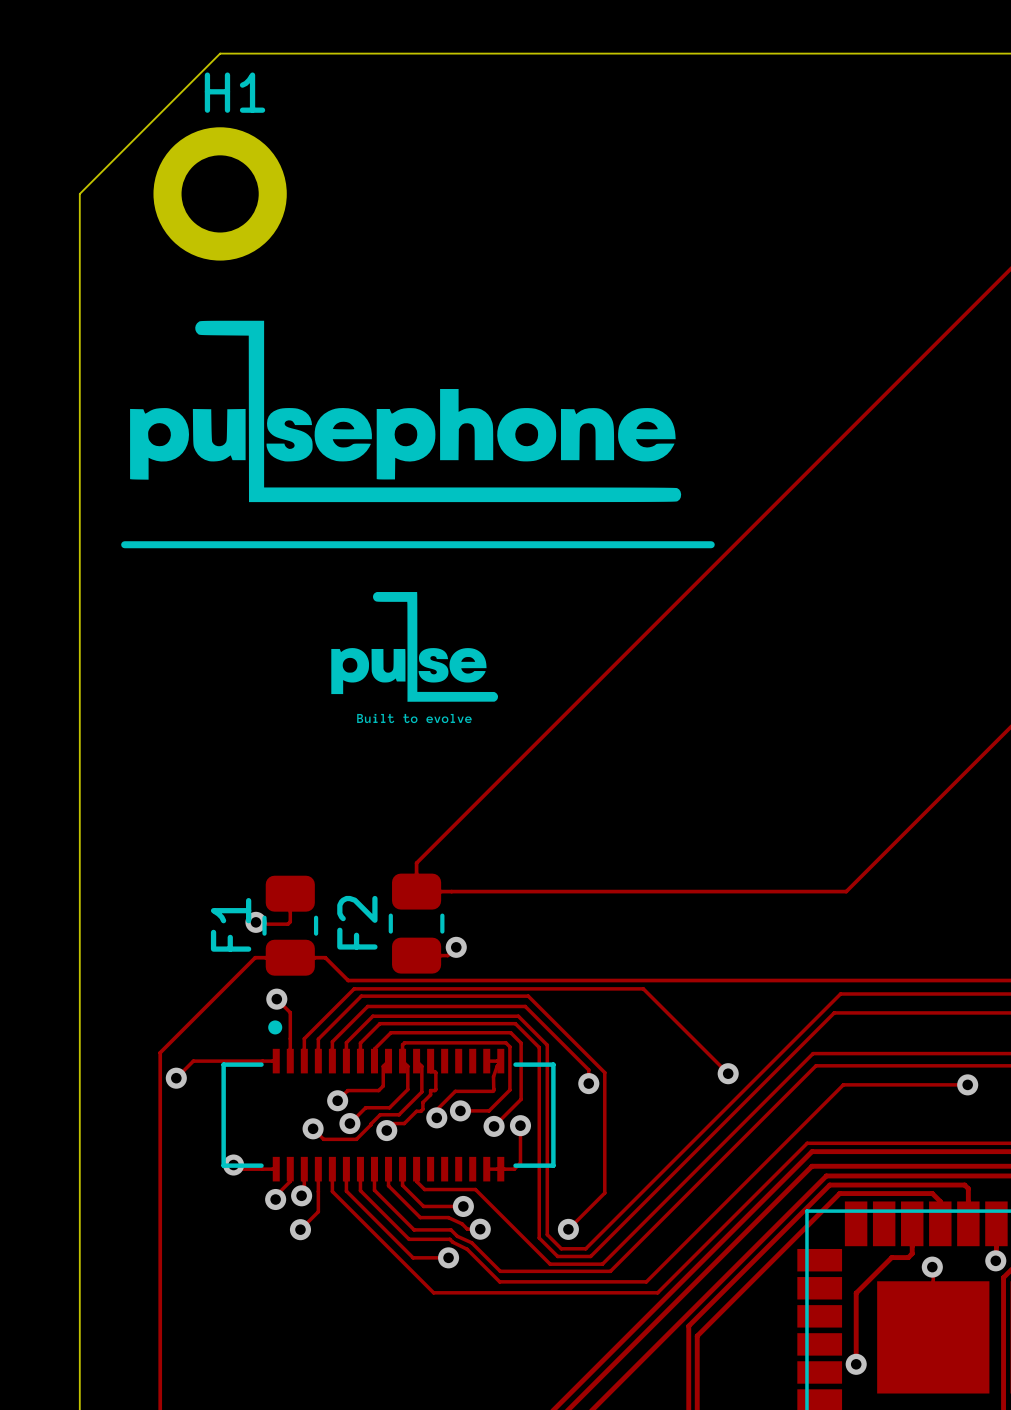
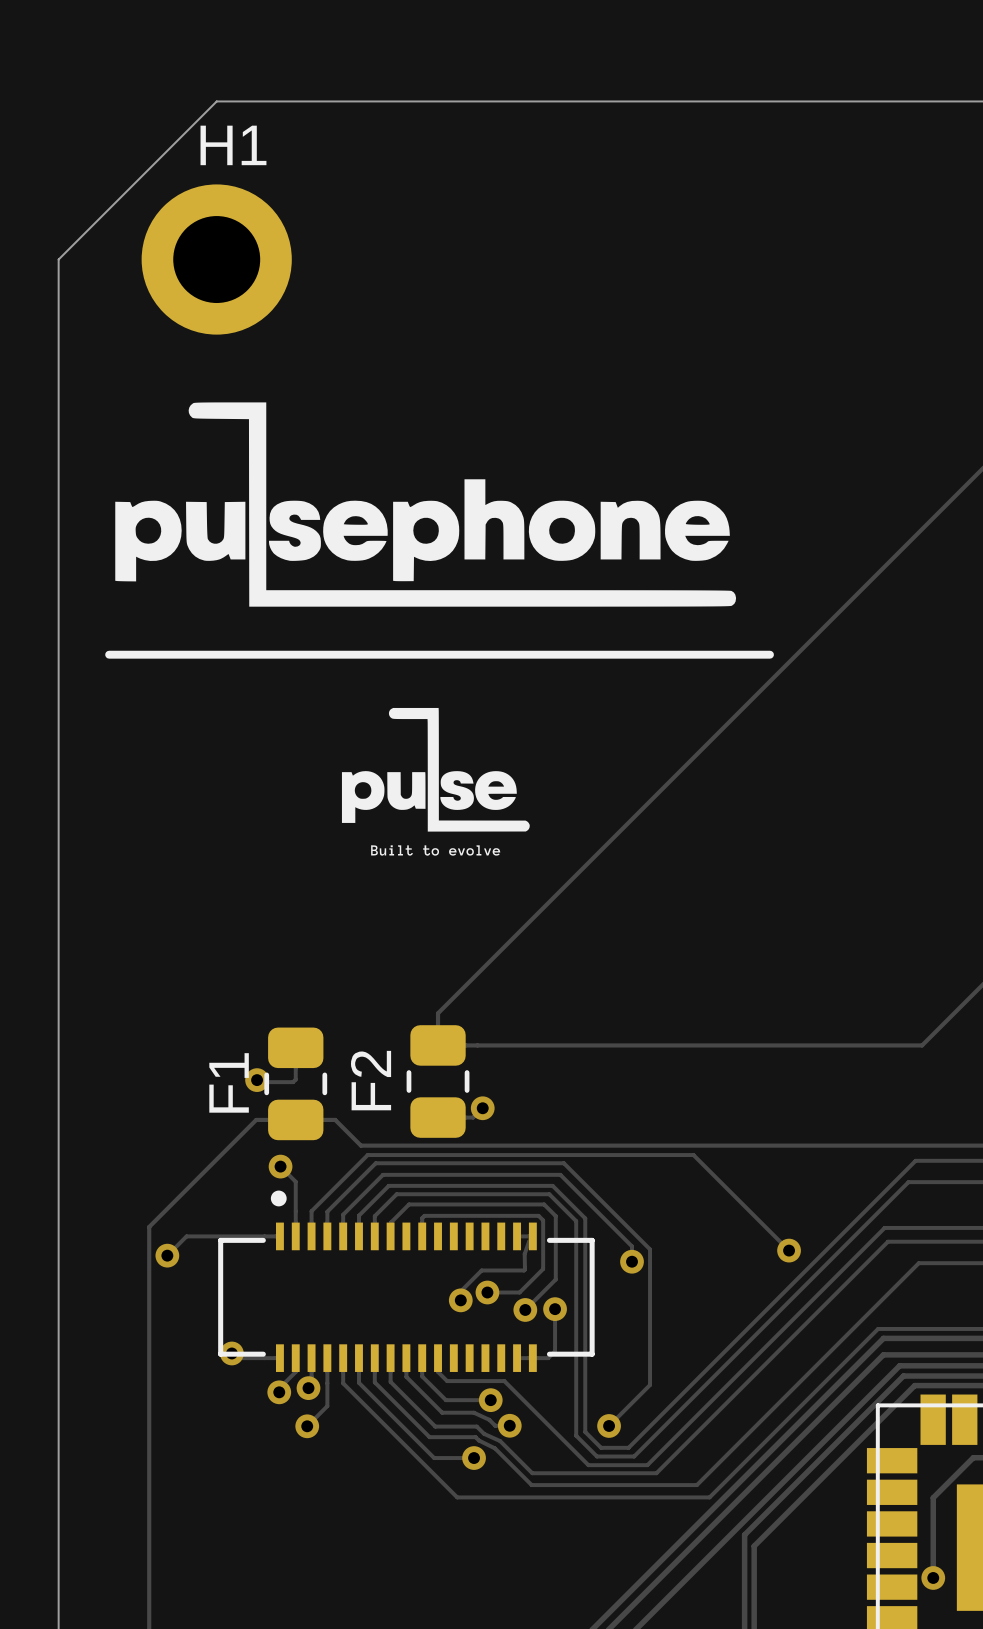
track: (388, 1061) (383, 1066) (383, 1086) (378, 1090) (347, 1090) (337, 1100) -> none
track: (402, 1061) (407, 1066) (407, 1089) (389, 1107) (365, 1107) (349, 1123) -> none
track: (416, 1061) (421, 1066) (421, 1091) (399, 1114) (380, 1114) (356, 1139) (323, 1139) (313, 1128) -> none
track: (430, 1061) (430, 1071) (435, 1072) (435, 1089) (430, 1090) (430, 1094) (422, 1102) (420, 1111) (416, 1111) (404, 1123) (393, 1123) (385, 1132) -> none
via: (337, 1100) -> none
via: (349, 1123) -> none
via: (313, 1128) -> none
via: (386, 1130) -> none

